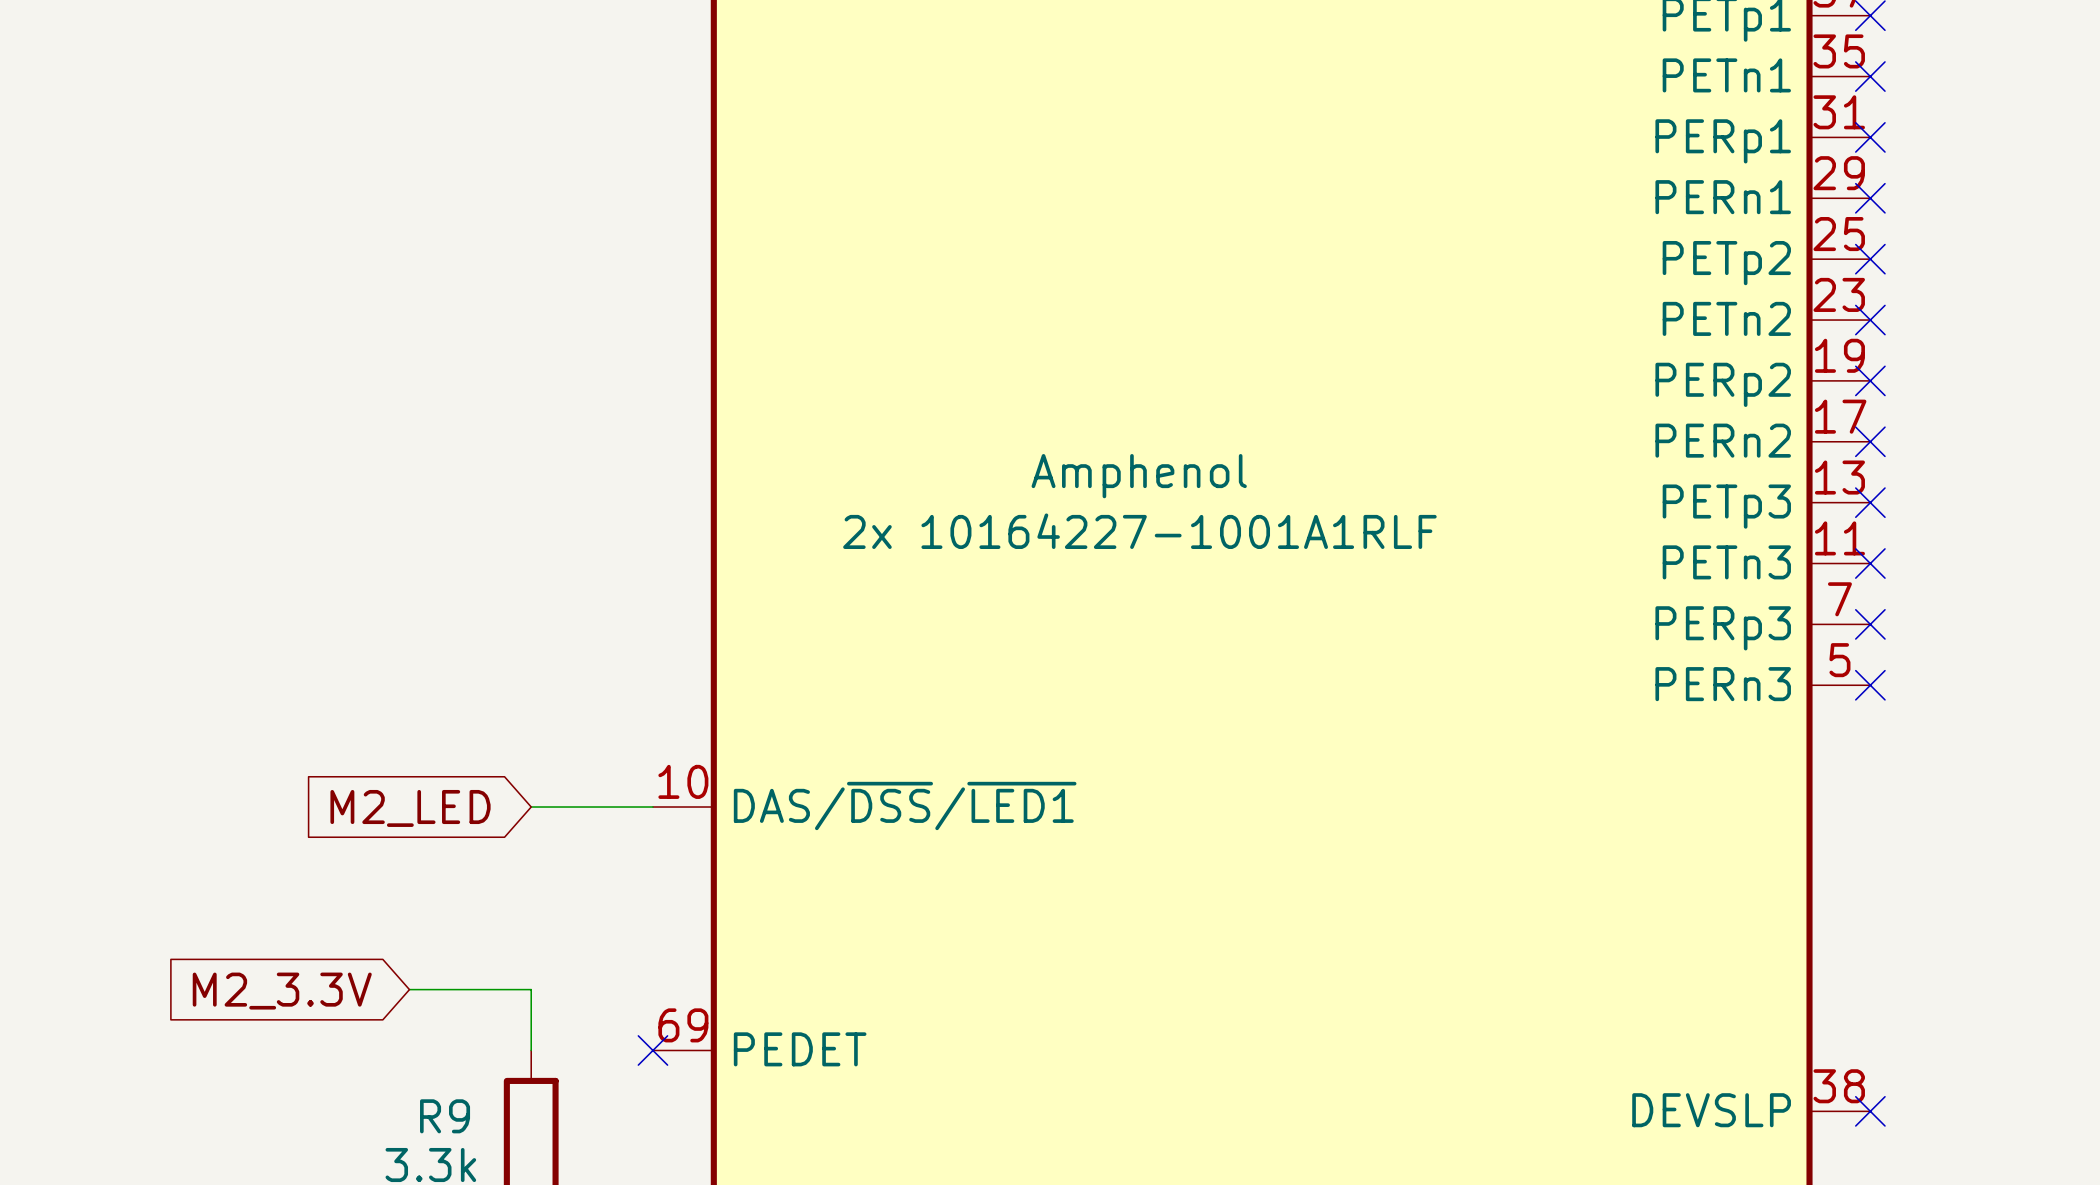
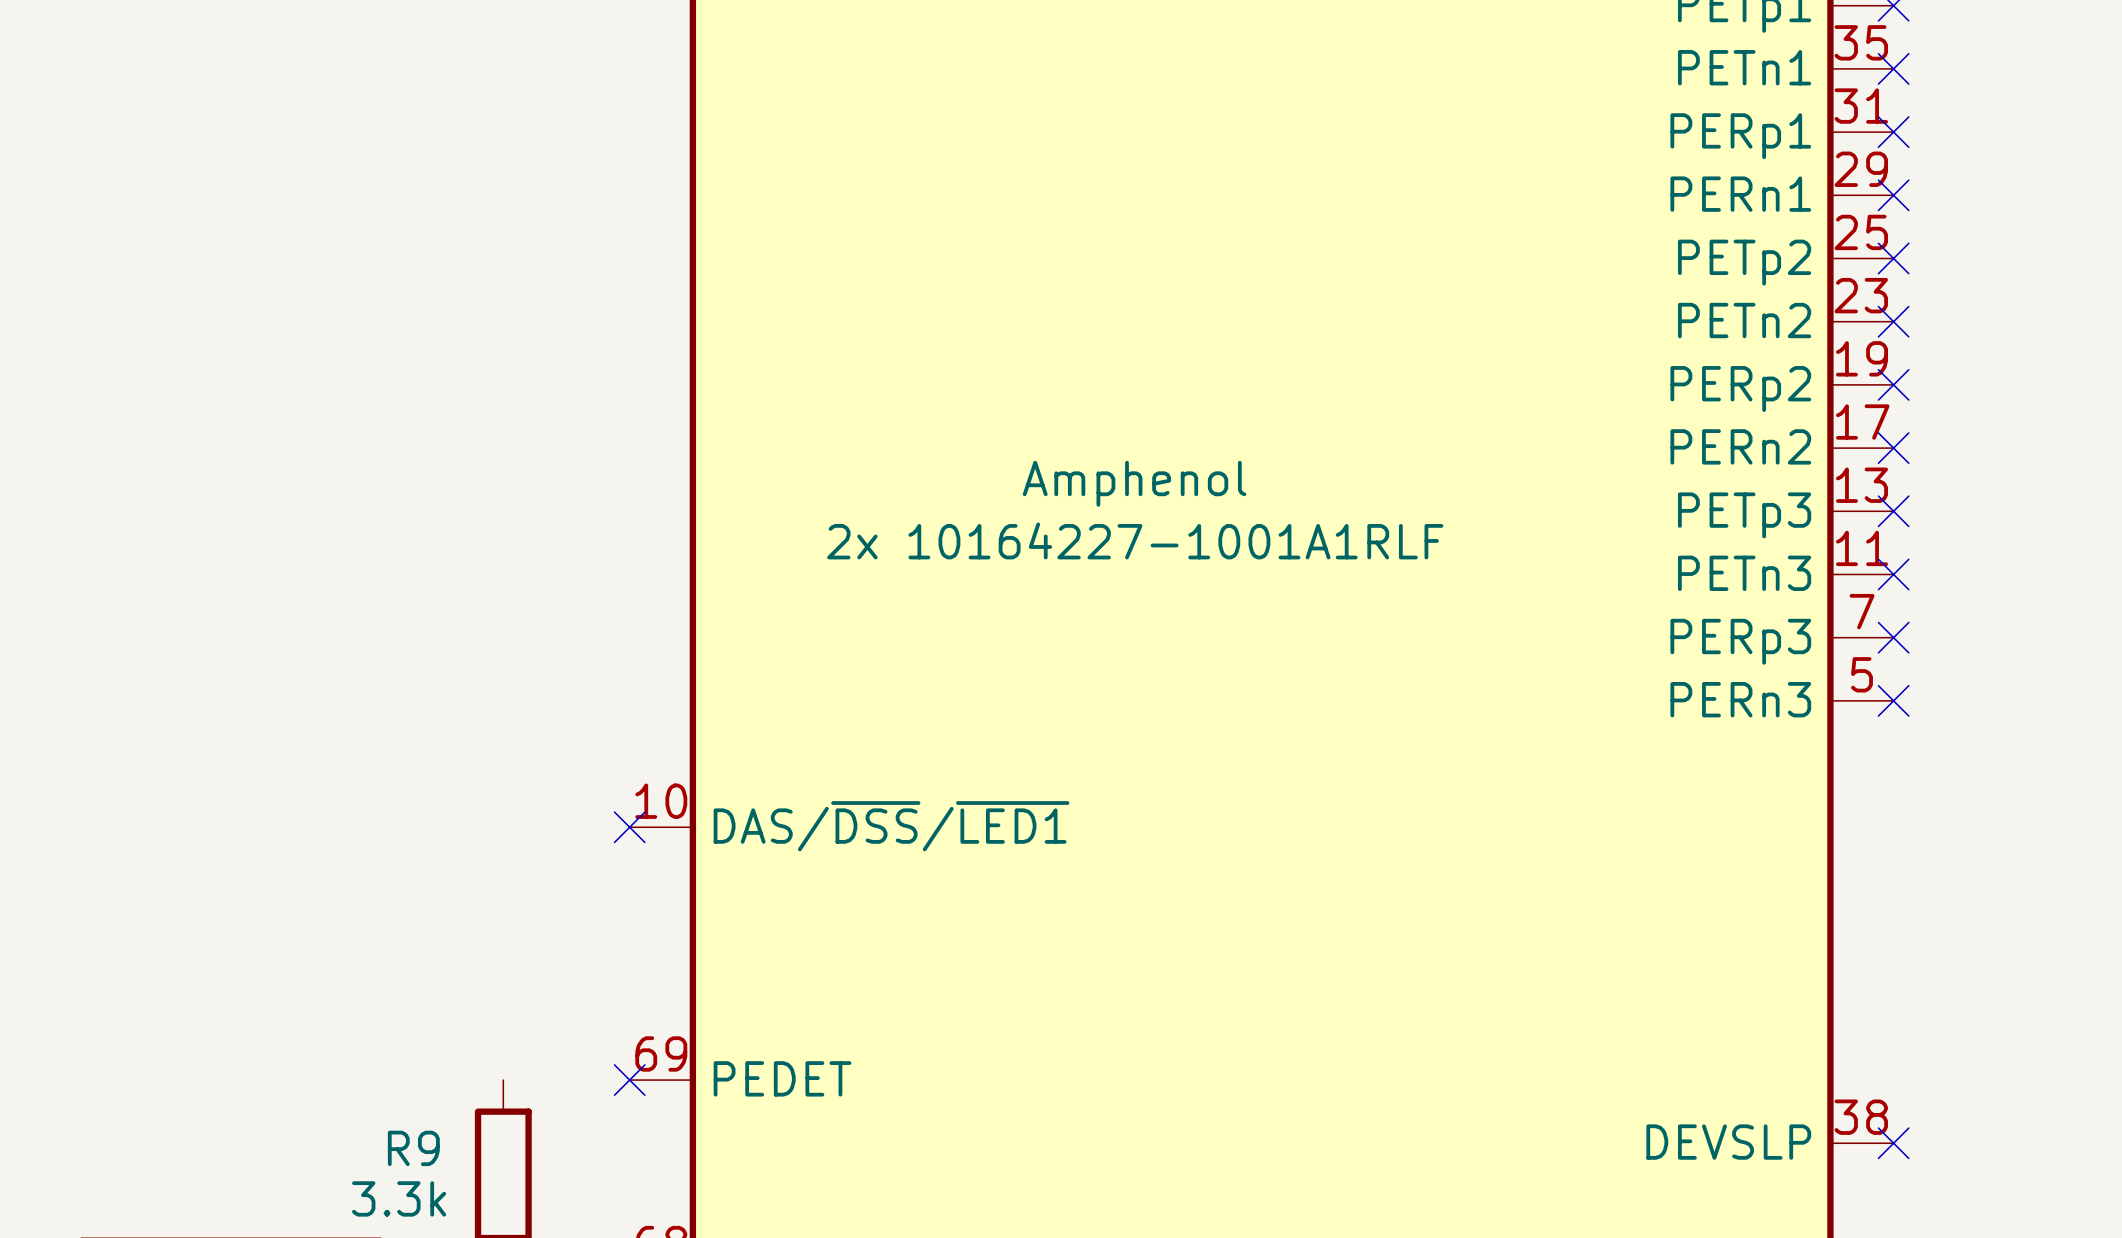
wire: (531, 807) (652, 807) -> none
no-connect mark: none -> (629, 827)
global label: M2_LED (410, 808) -> none
wire: (409, 989) (531, 989) (531, 1050) -> none
global label: M2_3.3V (282, 991) -> none

